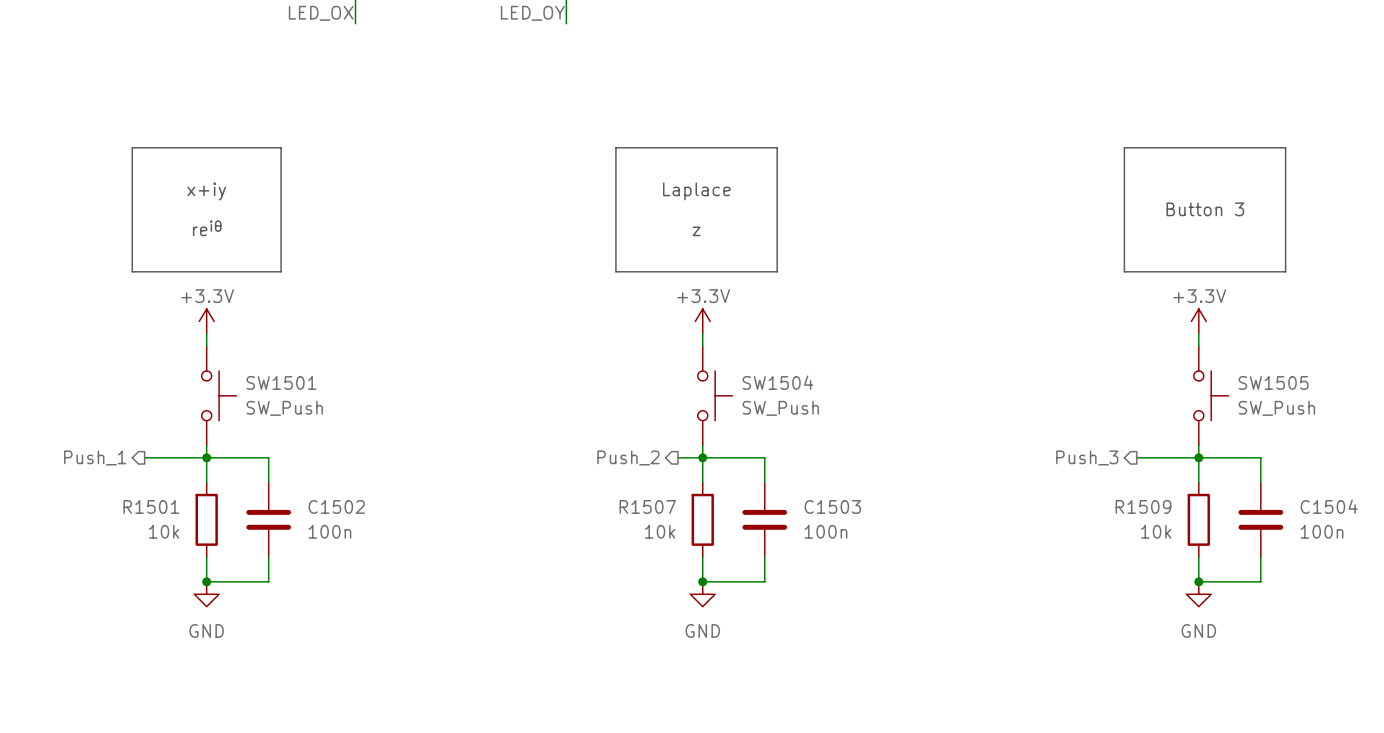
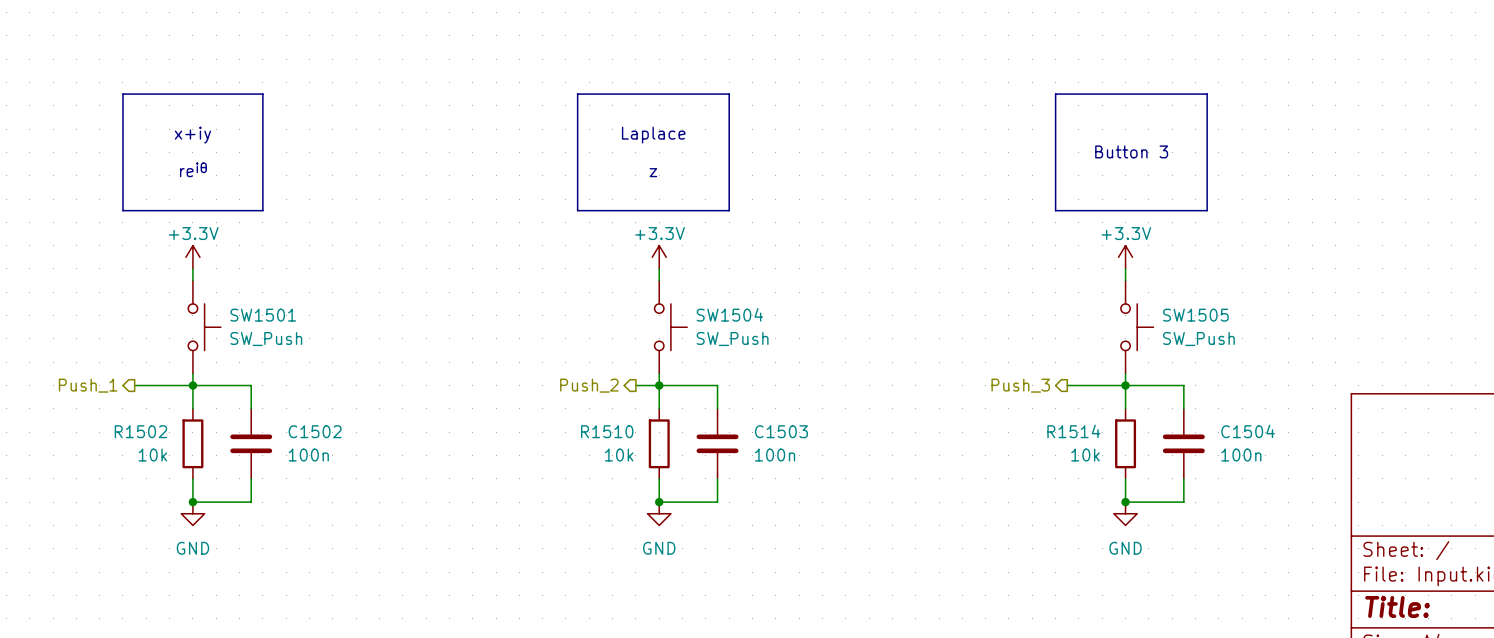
R1501 name: R1501 (151, 506) -> R1502 (140, 431)
R1507 name: R1507 (647, 506) -> R1510 (607, 431)
R1509 name: R1509 (1143, 506) -> R1514 (1073, 431)

